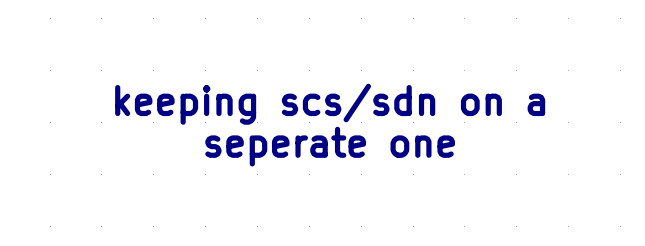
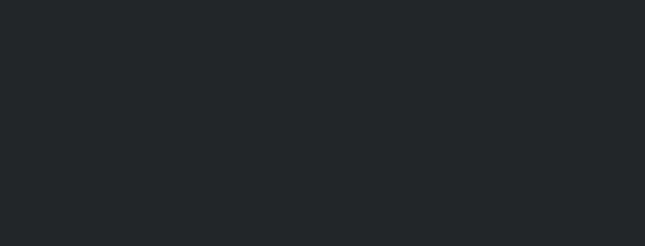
text: keeping scs/sdn on a (330, 104) -> none
text: seperate one (330, 146) -> none

